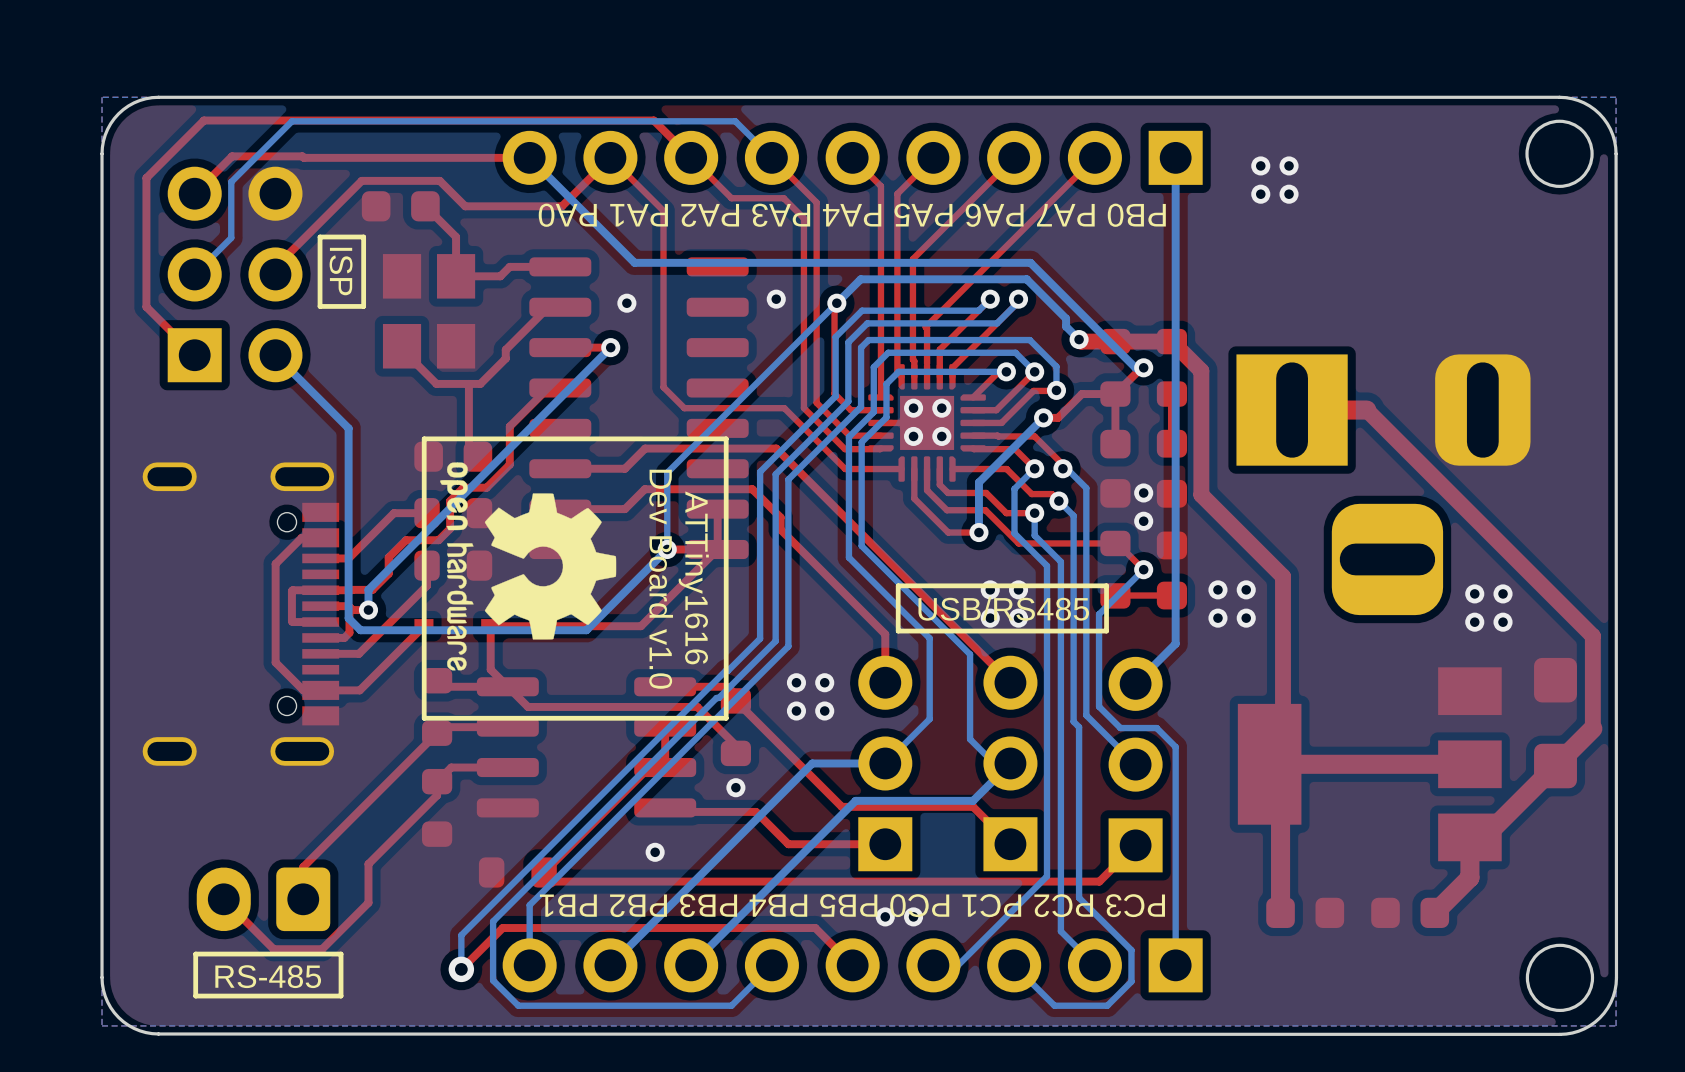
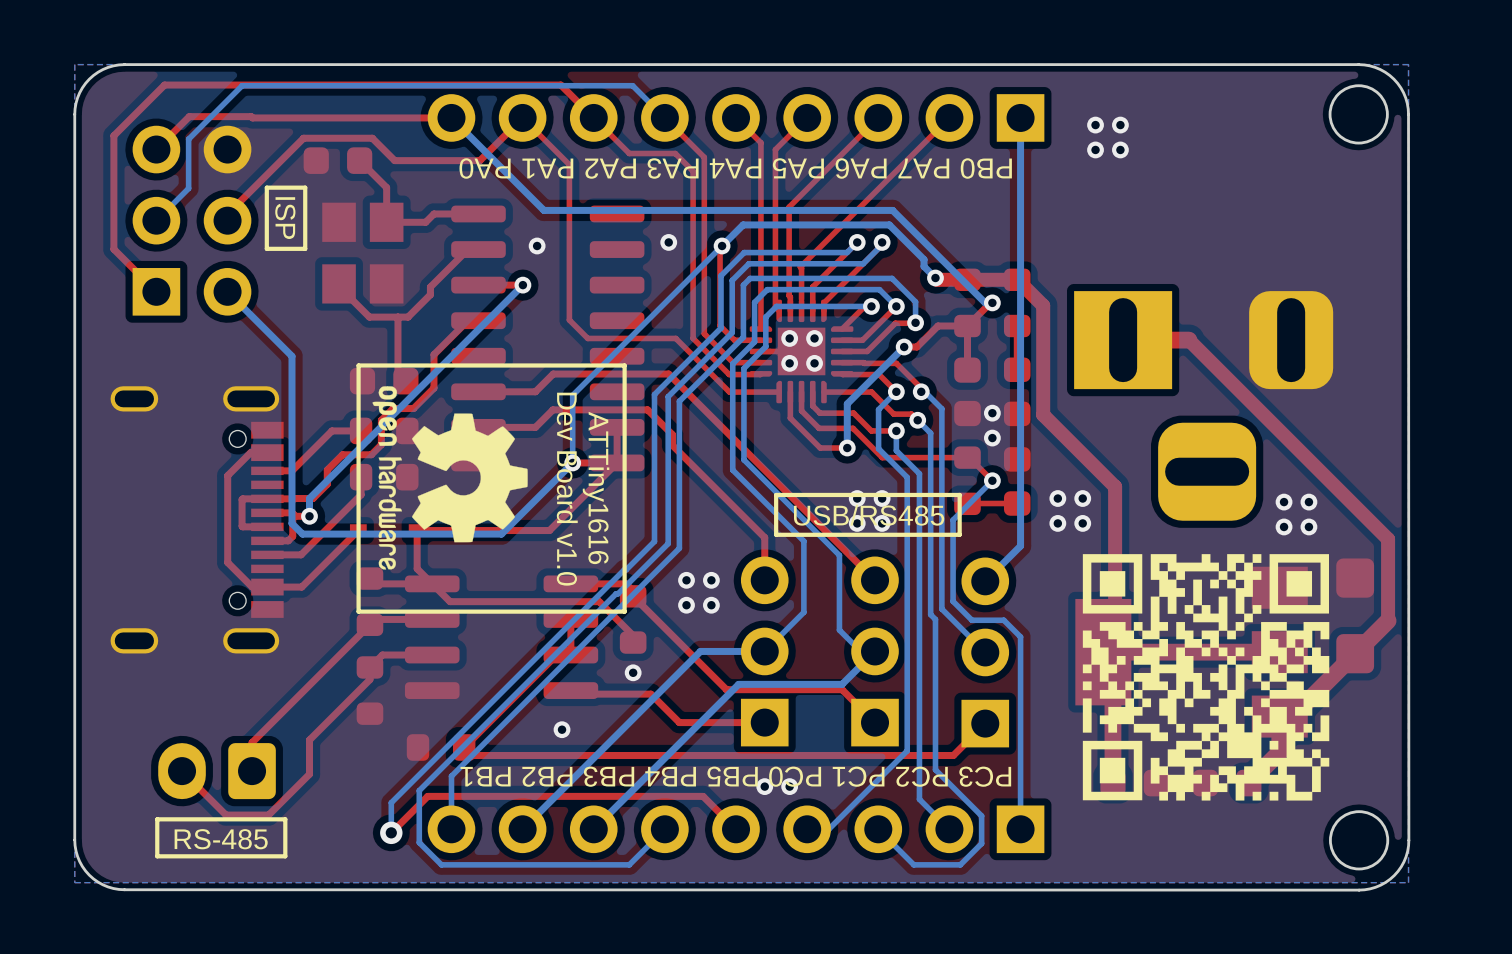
drawing: none -> [1082, 554, 1330, 801]

